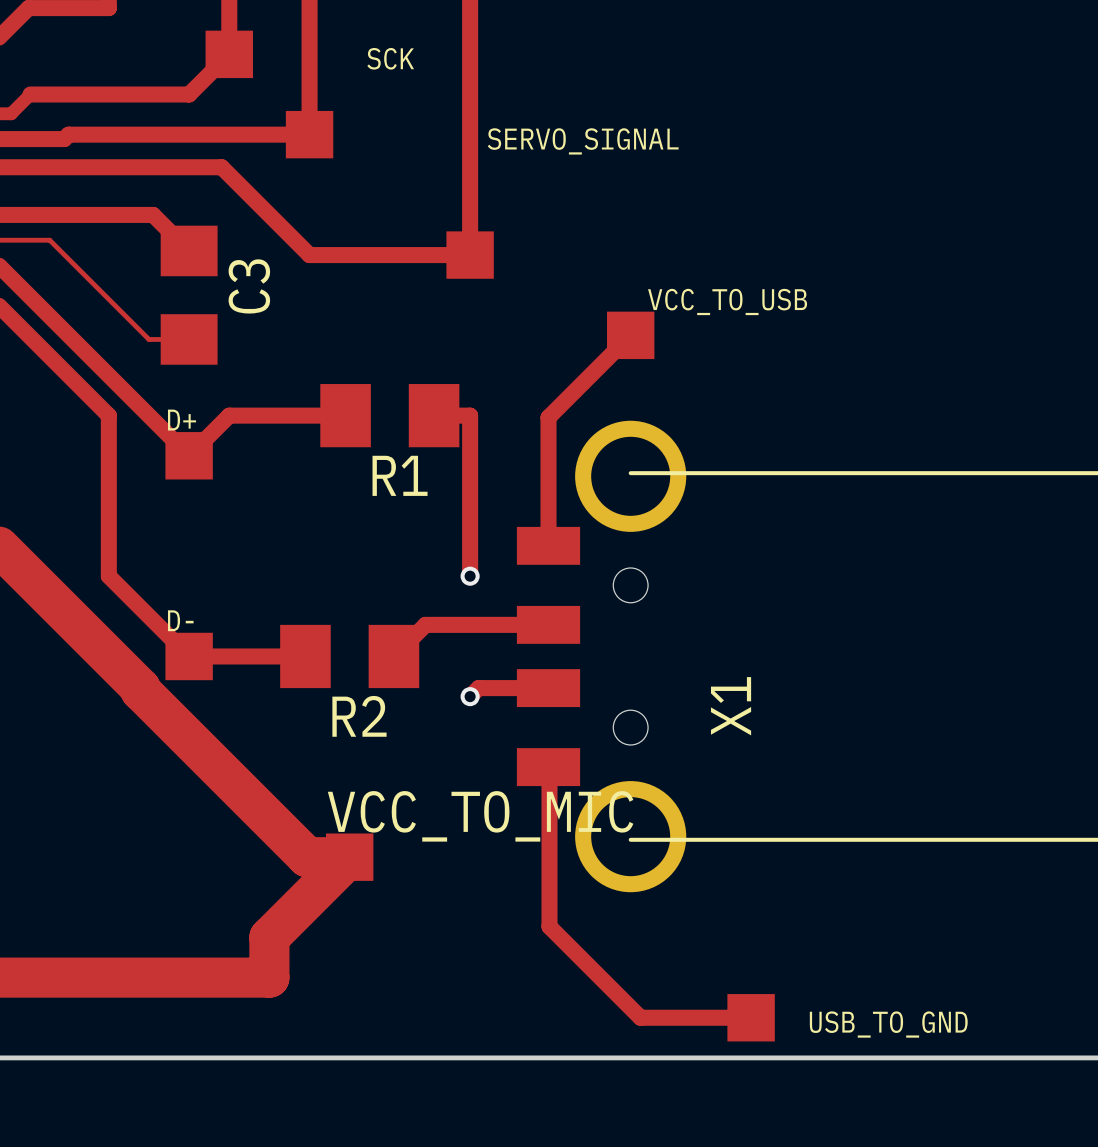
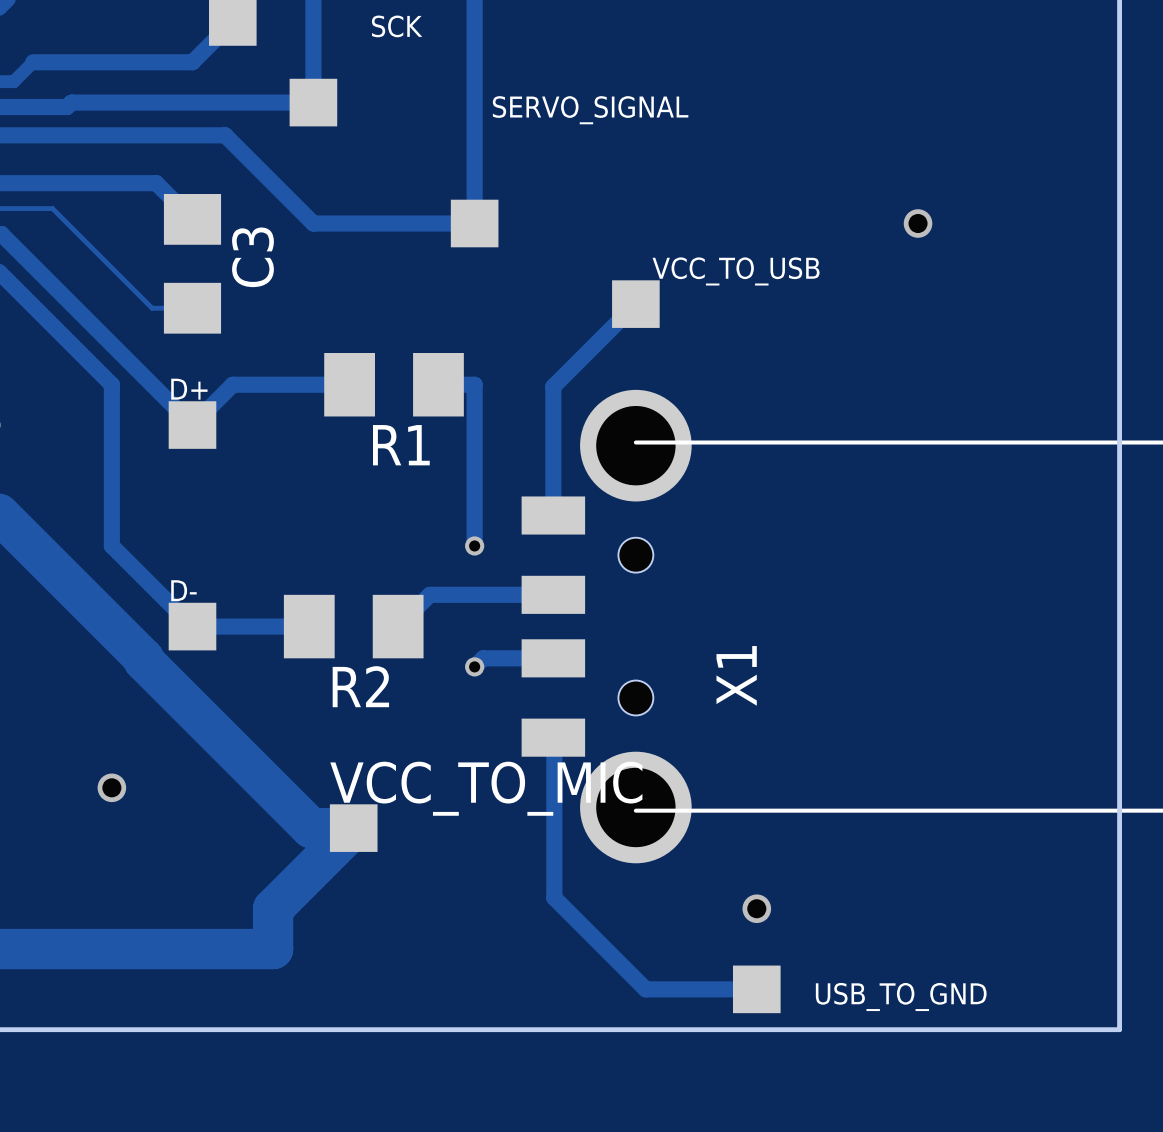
via: none -> (918, 223)
via: none -> (111, 787)
via: none -> (756, 908)

